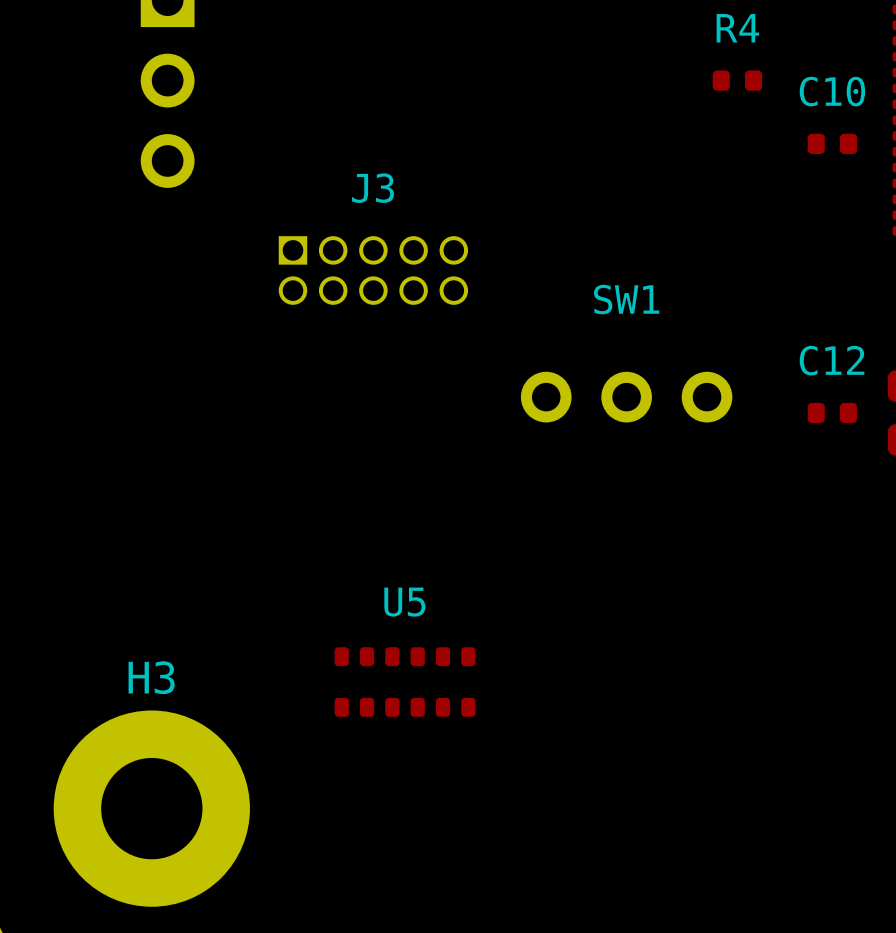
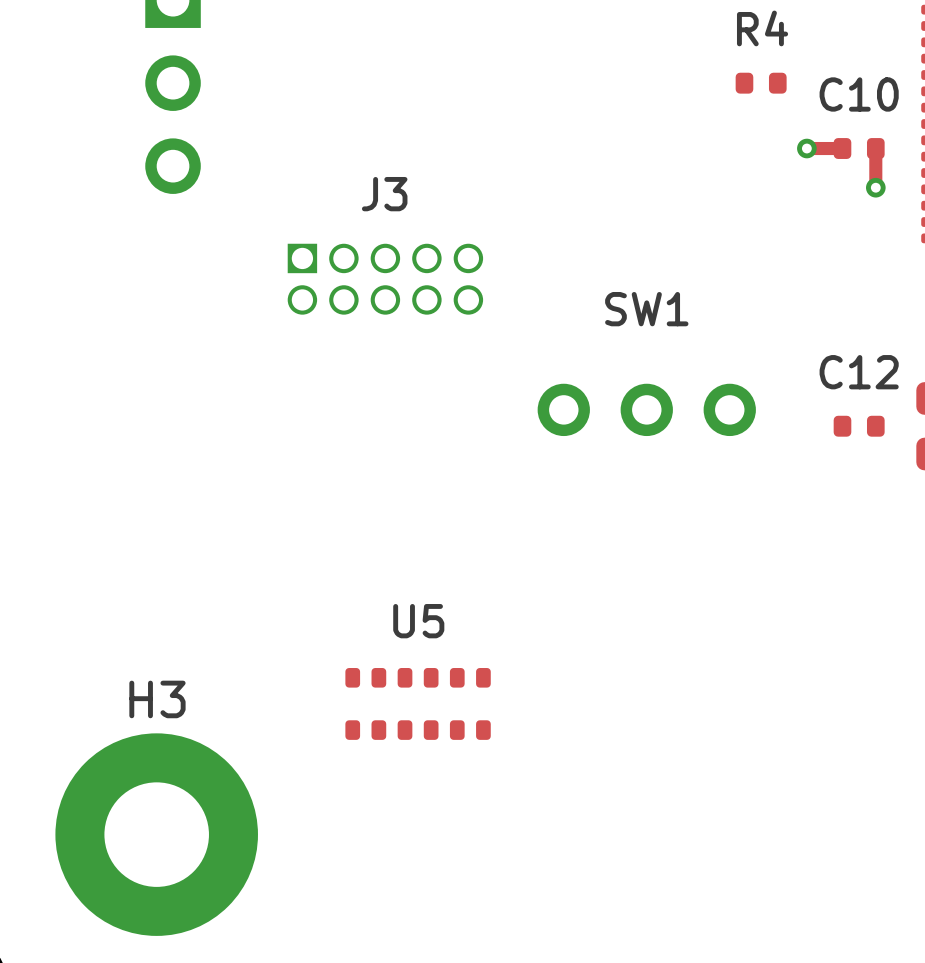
top track: none -> (806, 148) (842, 148)
via: none -> (806, 148)
top track: none -> (875, 148) (875, 187)
via: none -> (875, 187)

